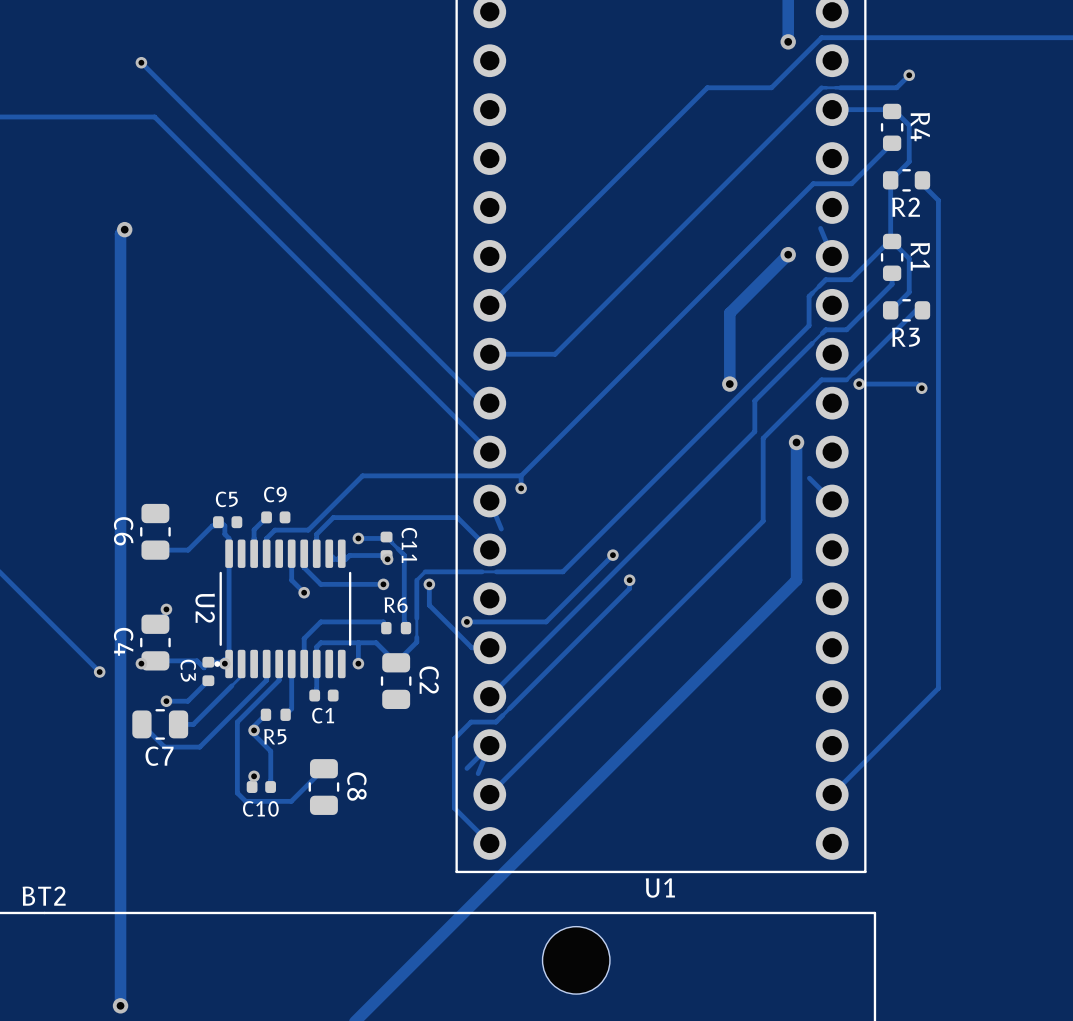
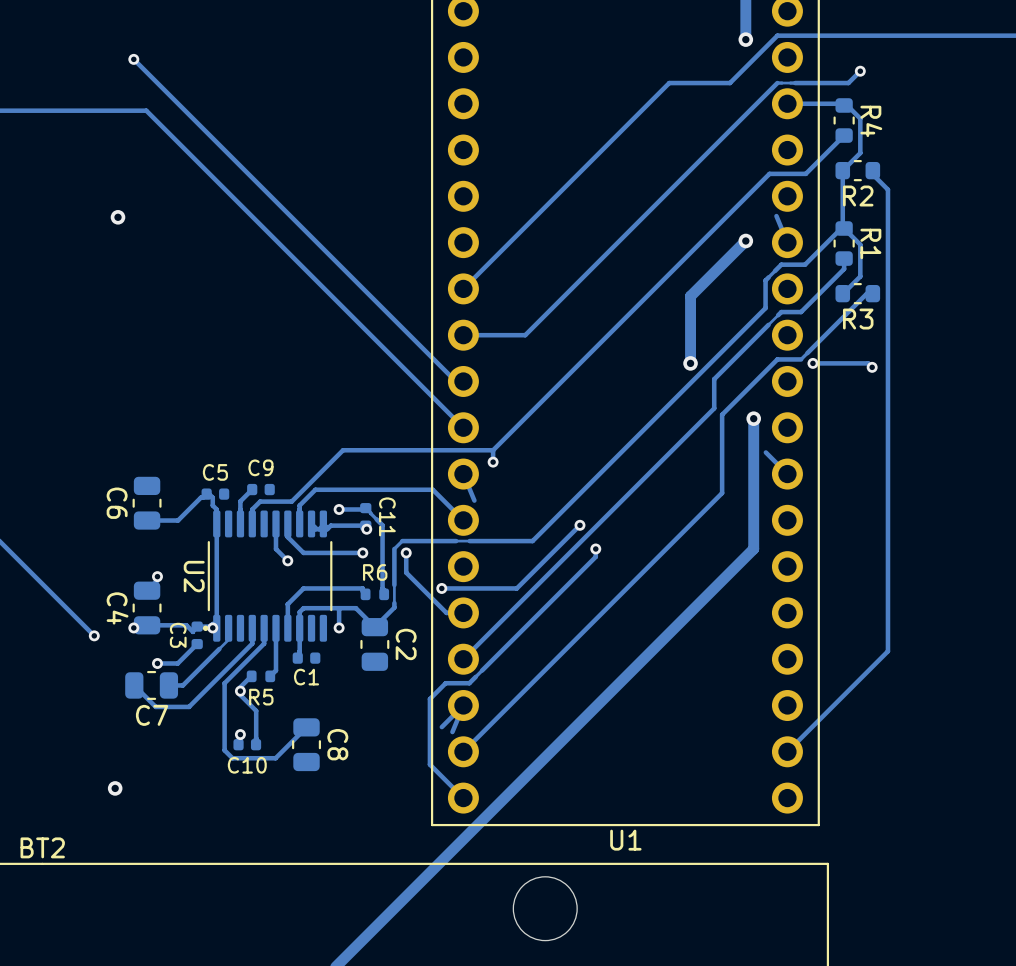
track: (124, 229) (120, 233) (120, 1005) -> none
via: none -> (115, 788)
via: (120, 1005) -> none

